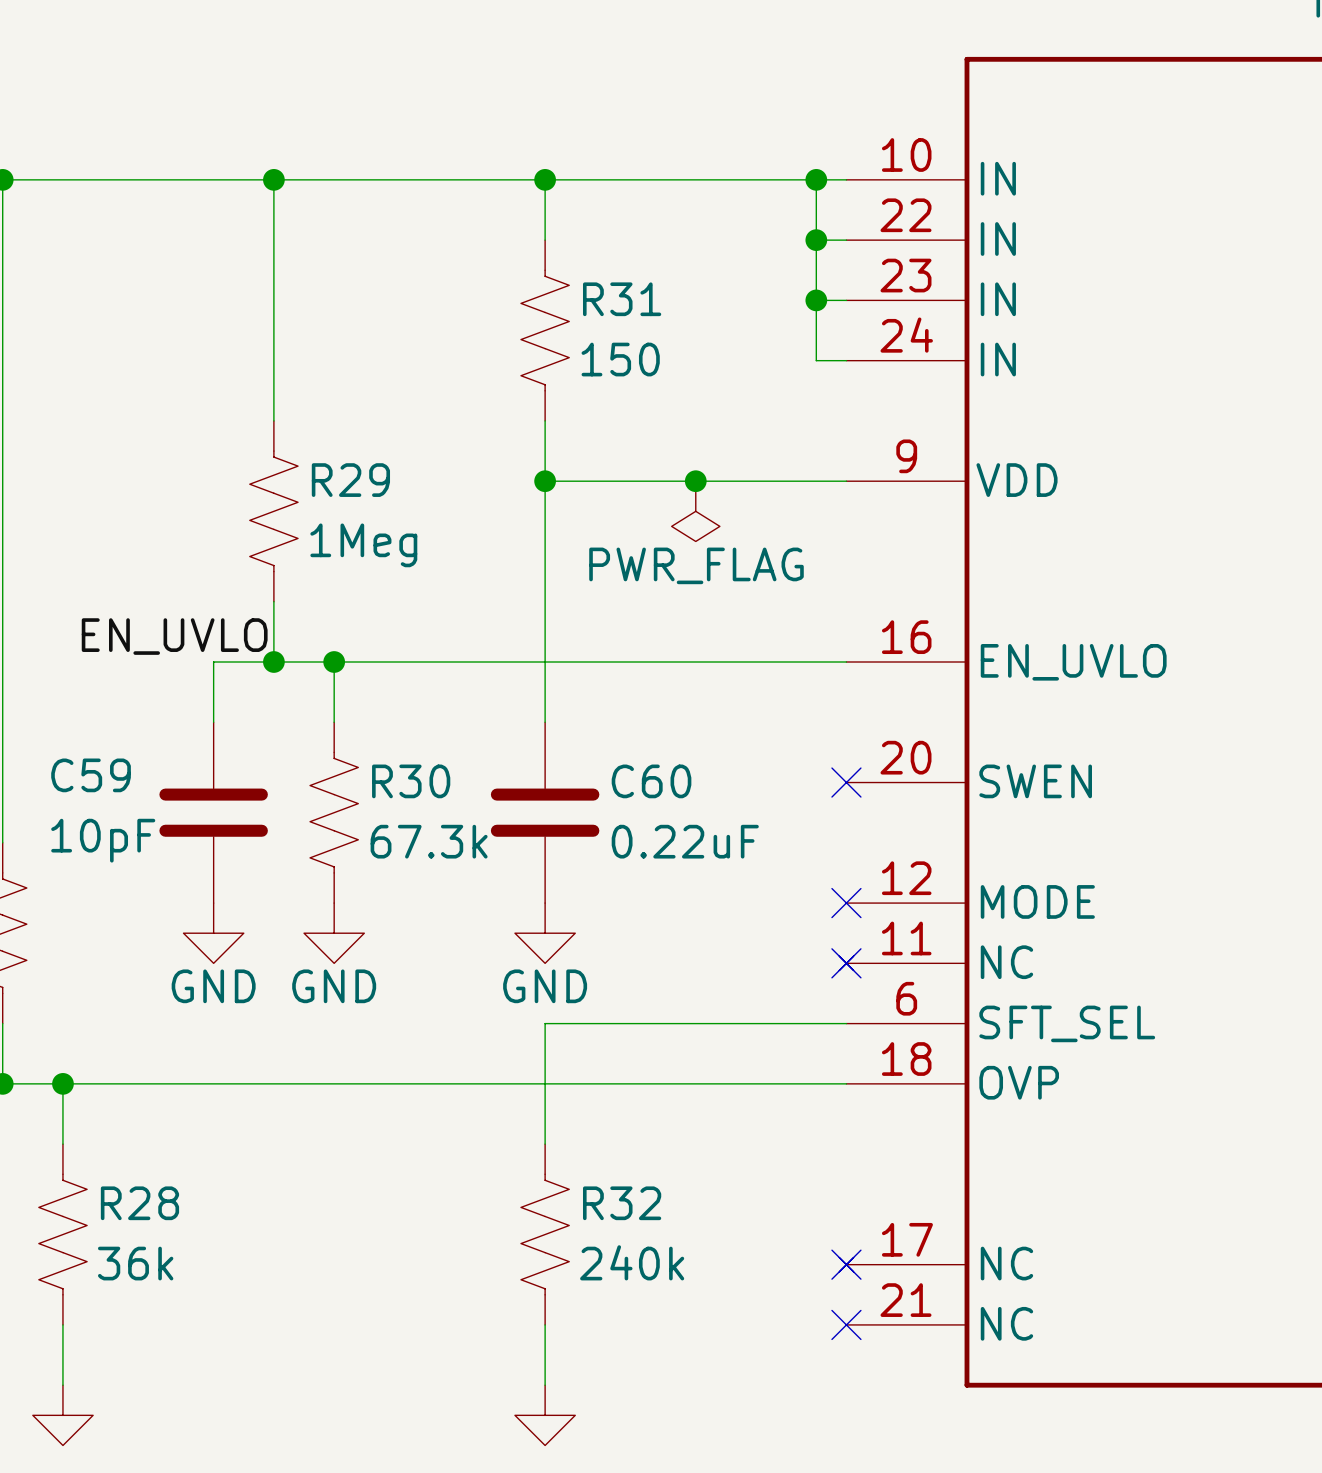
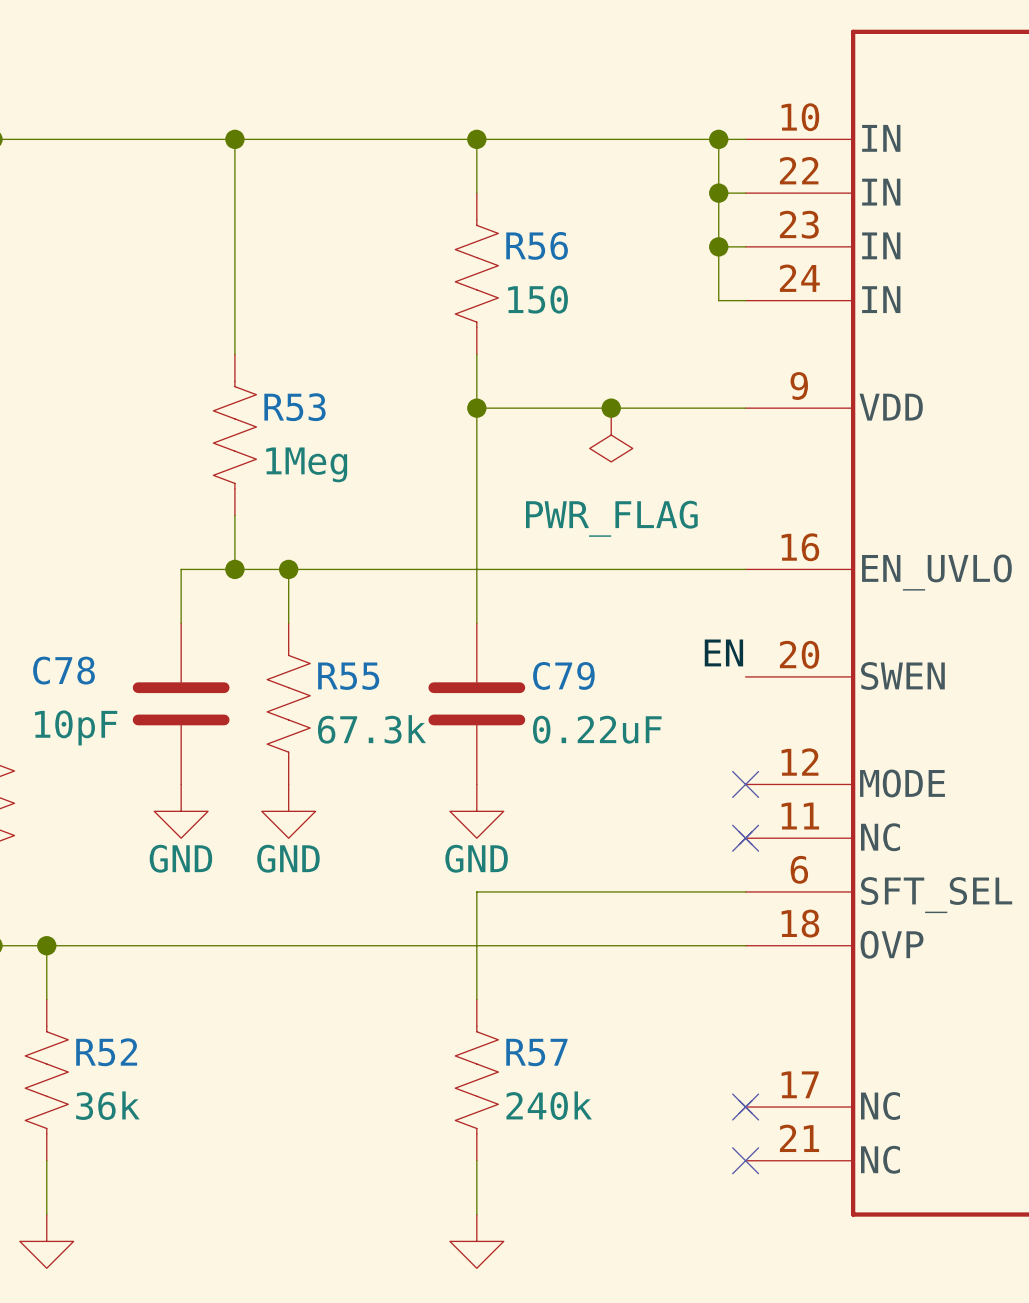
R31 name: R31 (622, 299) -> R56 (537, 245)
R29 name: R29 (350, 480) -> R53 (294, 407)
power symbol text position: PWR_FLAG (696, 565) -> PWR_FLAG (611, 518)
label: EN_UVLO (174, 636) -> none
label: none -> EN (723, 652)
C59 name: C59 (91, 775) -> C78 (64, 670)
R30 name: R30 (411, 781) -> R55 (348, 676)
C60 name: C60 (651, 781) -> C79 (563, 675)
no-connect mark: (846, 782) -> none
R28 name: R28 (139, 1203) -> R52 (106, 1052)
R32 name: R32 (622, 1203) -> R57 (536, 1052)

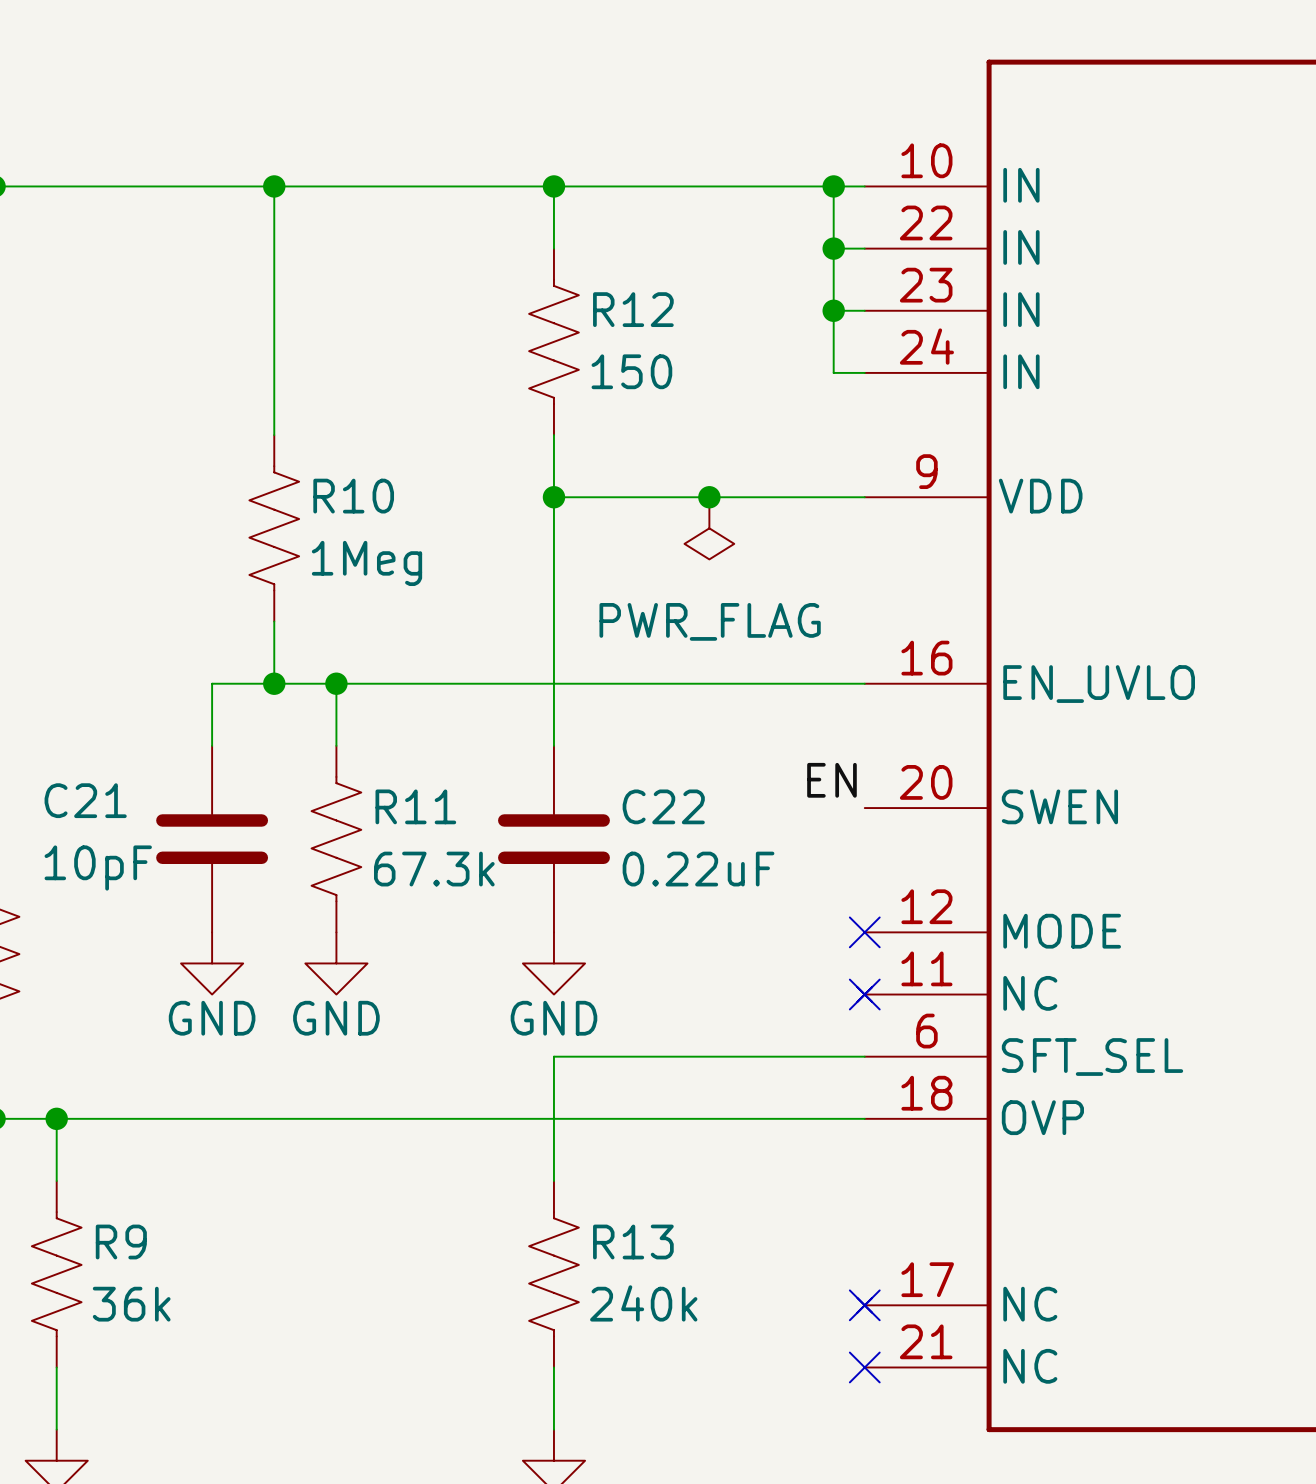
R56 name: R56 (537, 245) -> R12 (633, 309)
R53 name: R53 (294, 407) -> R10 (353, 496)
C78 name: C78 (64, 670) -> C21 (85, 800)
C79 name: C79 (563, 675) -> C22 (663, 806)
R55 name: R55 (348, 676) -> R11 (415, 806)
R52 name: R52 (106, 1052) -> R9 (121, 1242)
R57 name: R57 (536, 1052) -> R13 (633, 1242)

